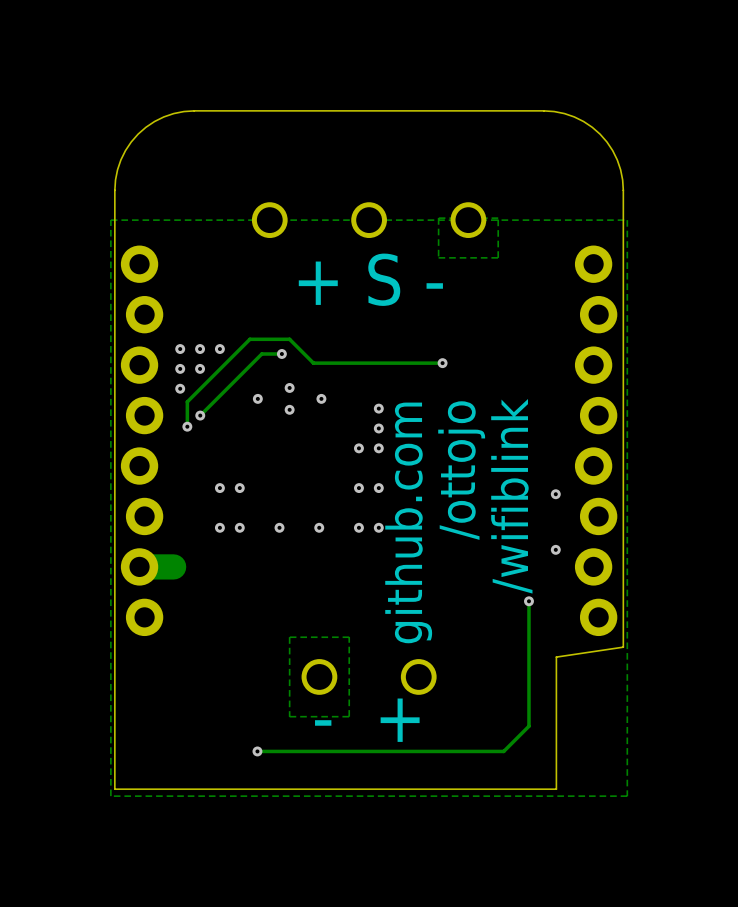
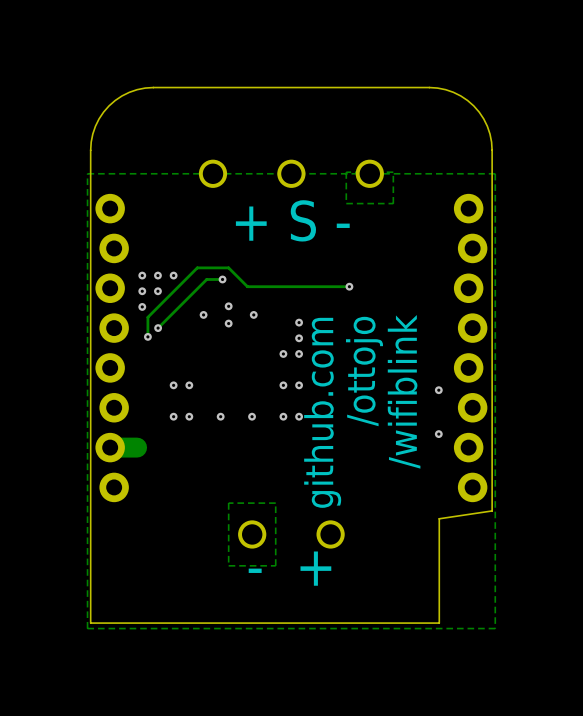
track: (528, 601) (528, 726) (503, 751) (257, 751) -> none
via: (528, 601) -> none
via: (257, 751) -> none

